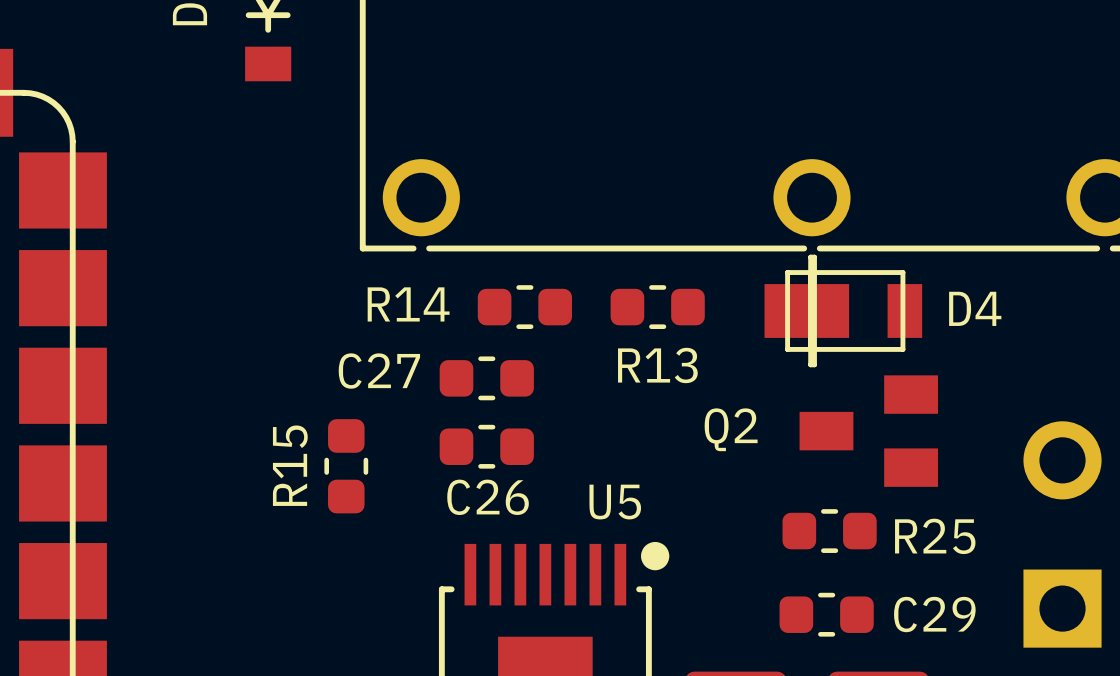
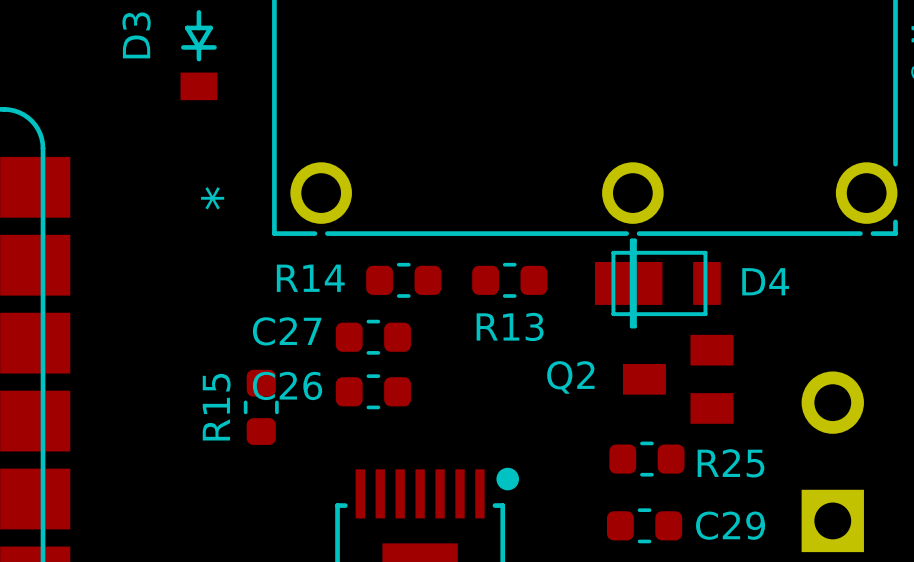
part text: none -> * (212, 198)
C26 name position: C26 (488, 497) -> C26 (287, 385)
U5 name: U5 (615, 502) -> none

